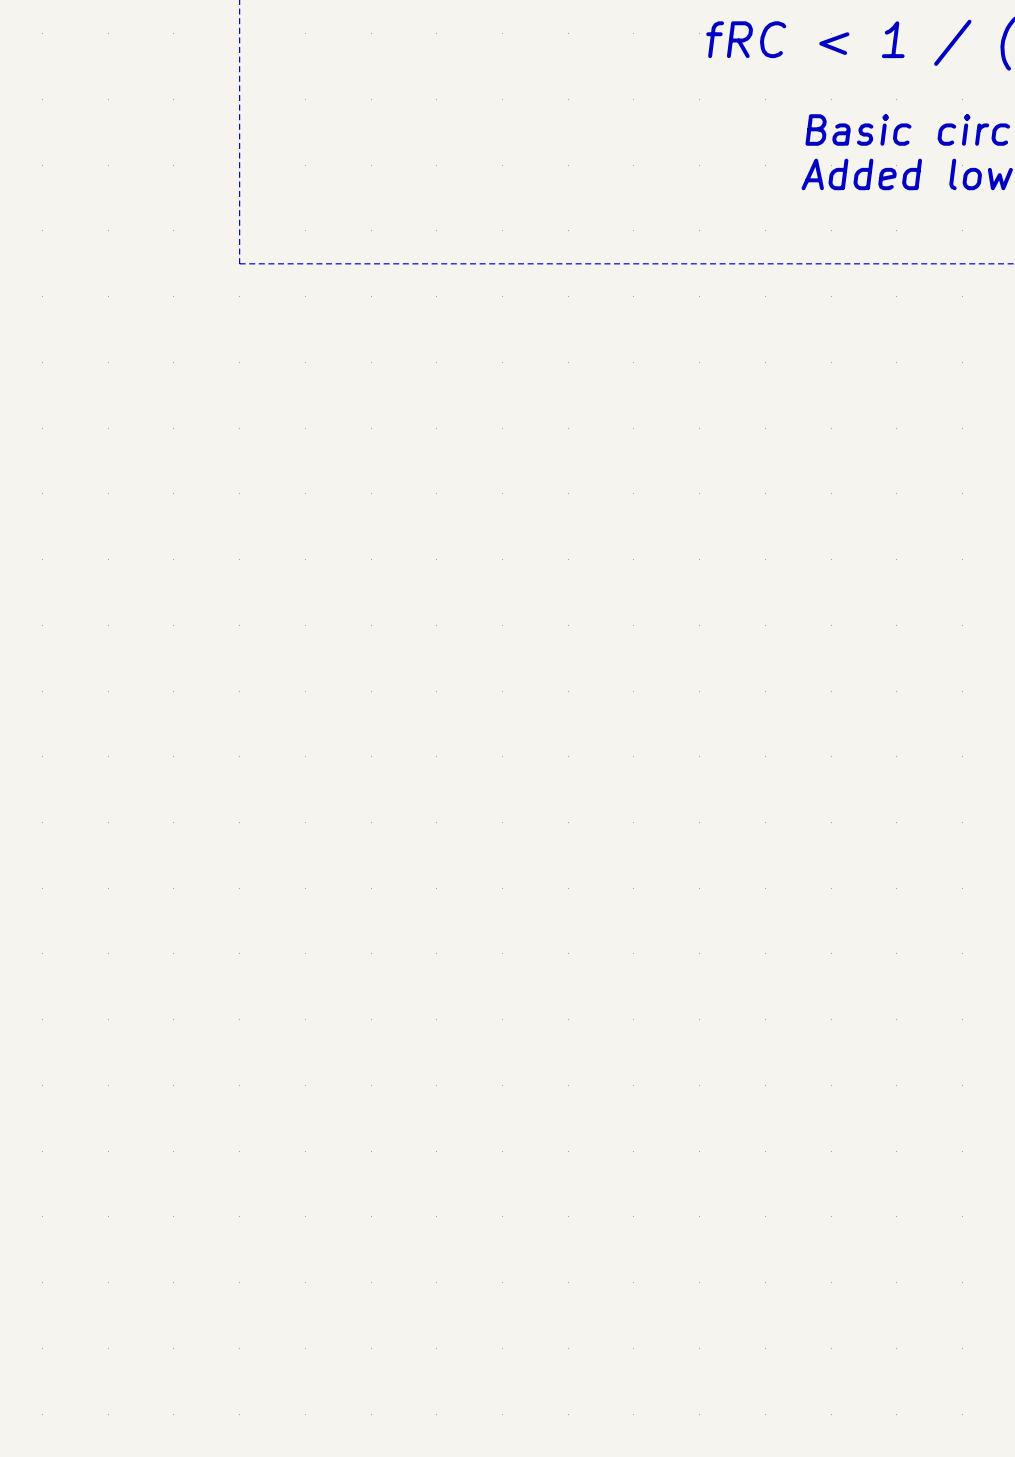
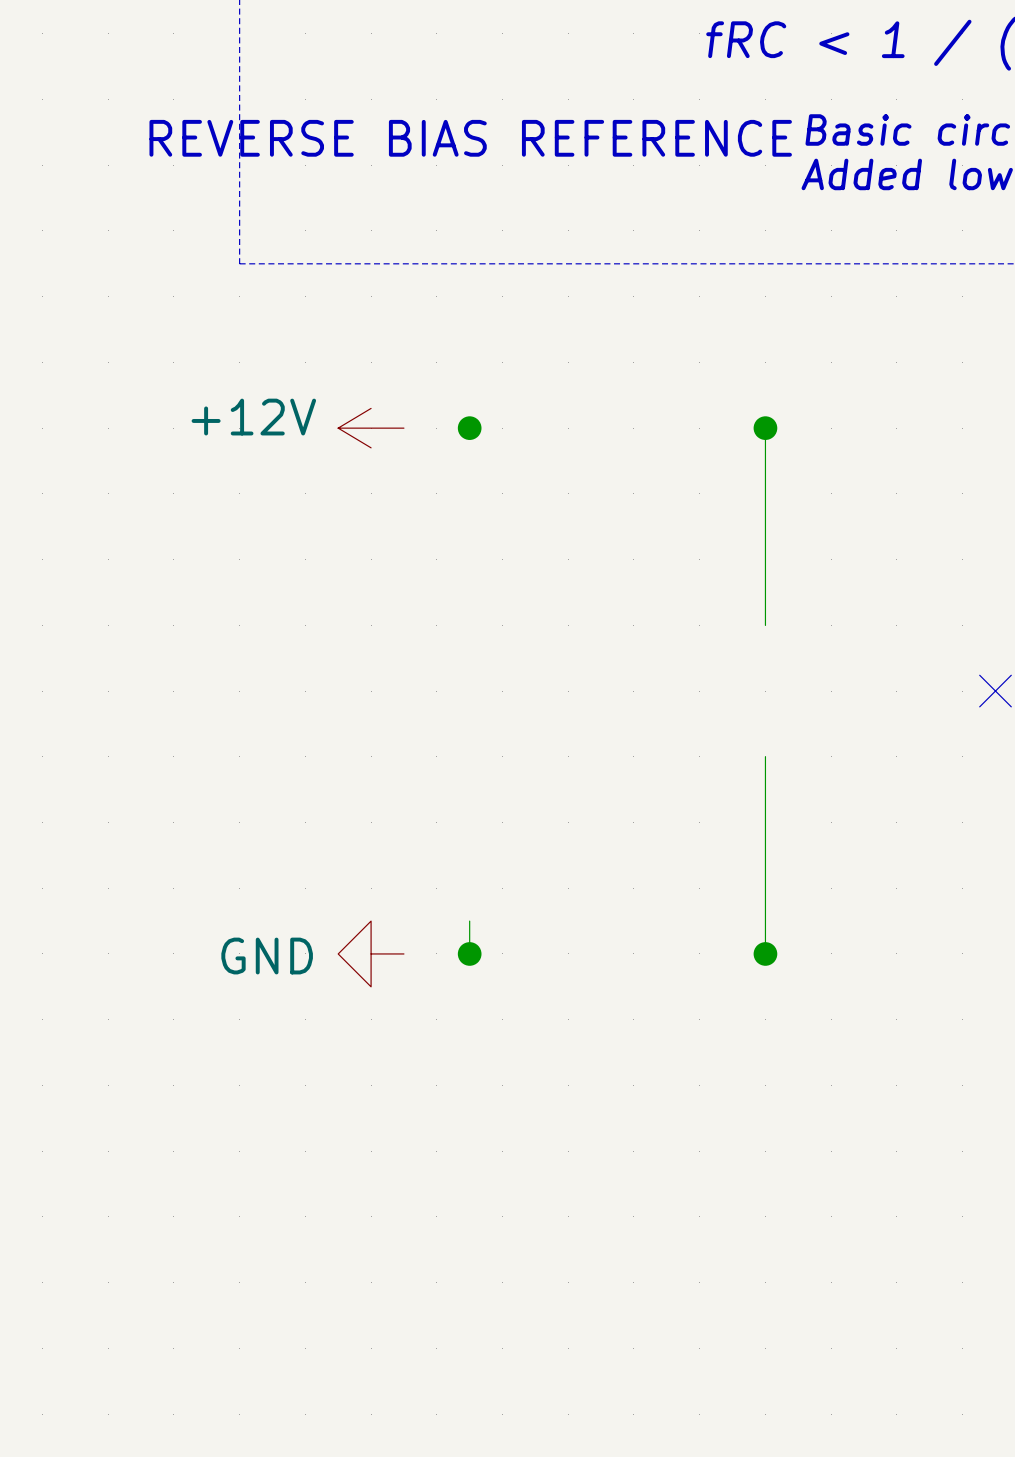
text: none -> REVERSE BIAS REFERENCE (470, 138)
power symbol: none -> +12V (371, 428)
junction: none -> (469, 428)
wire: none -> (765, 428) (765, 625)
junction: none -> (765, 428)
no-connect mark: none -> (995, 691)
wire: none -> (765, 756) (765, 953)
wire: none -> (469, 921) (469, 953)
power symbol: none -> GND (371, 953)
junction: none -> (469, 953)
junction: none -> (765, 953)

